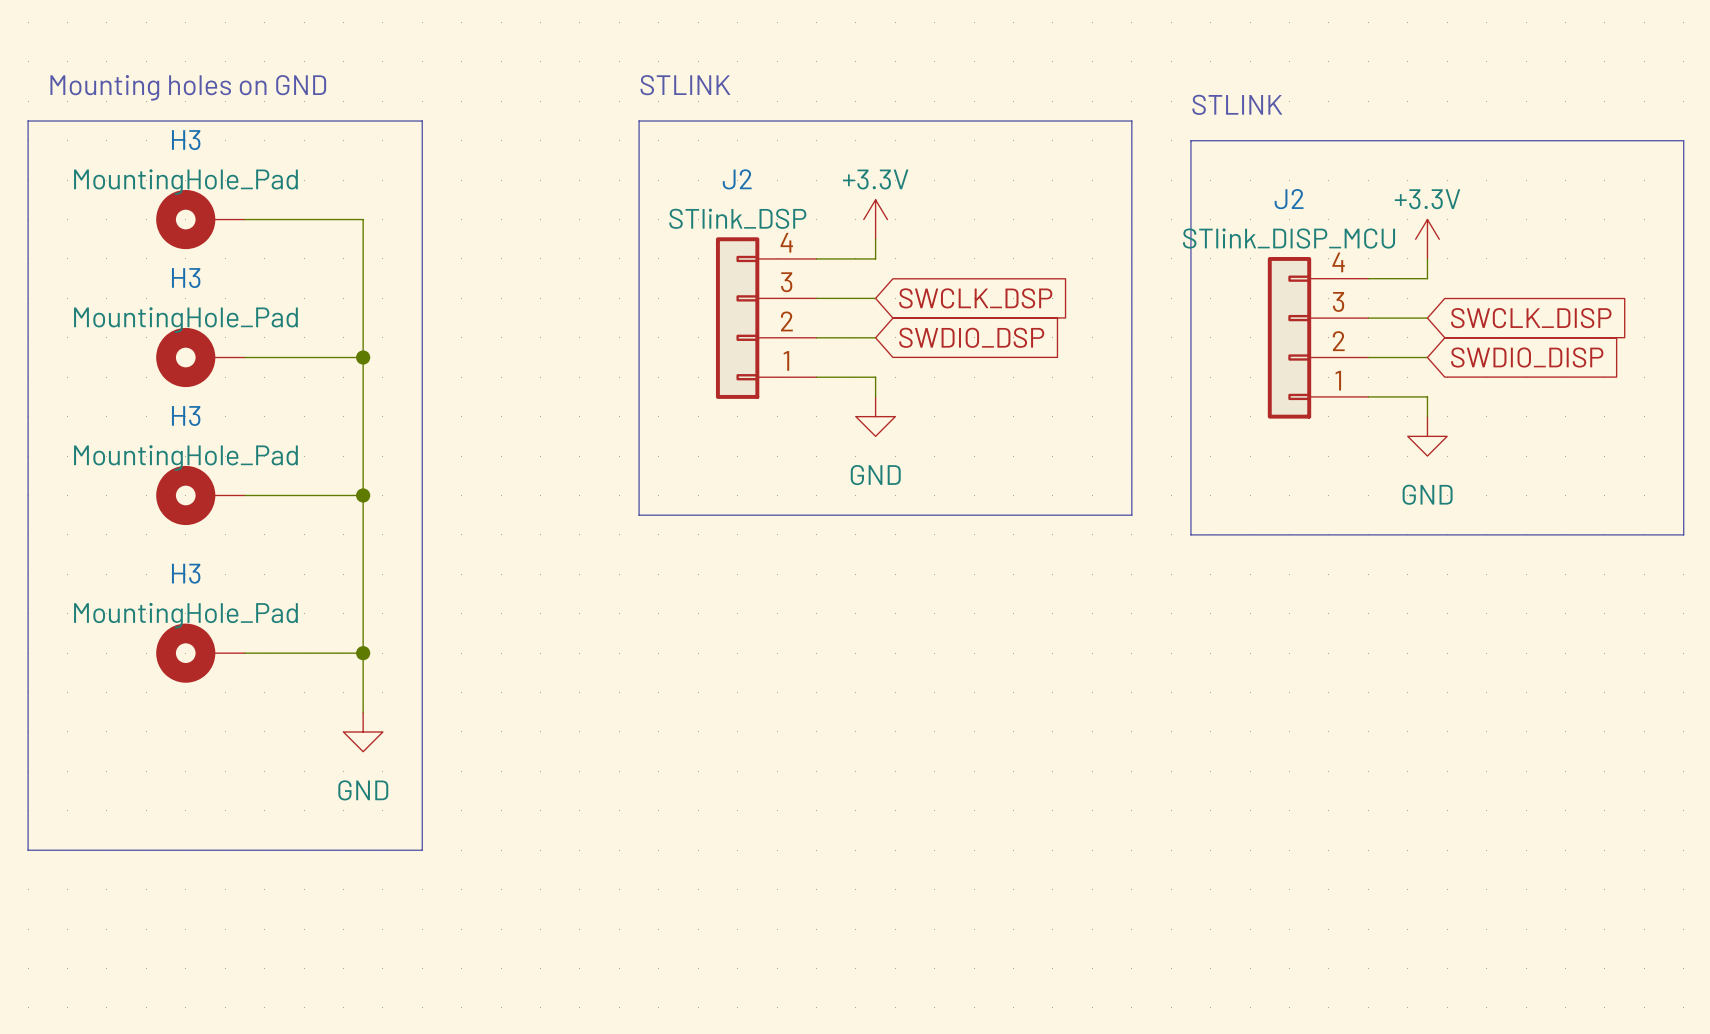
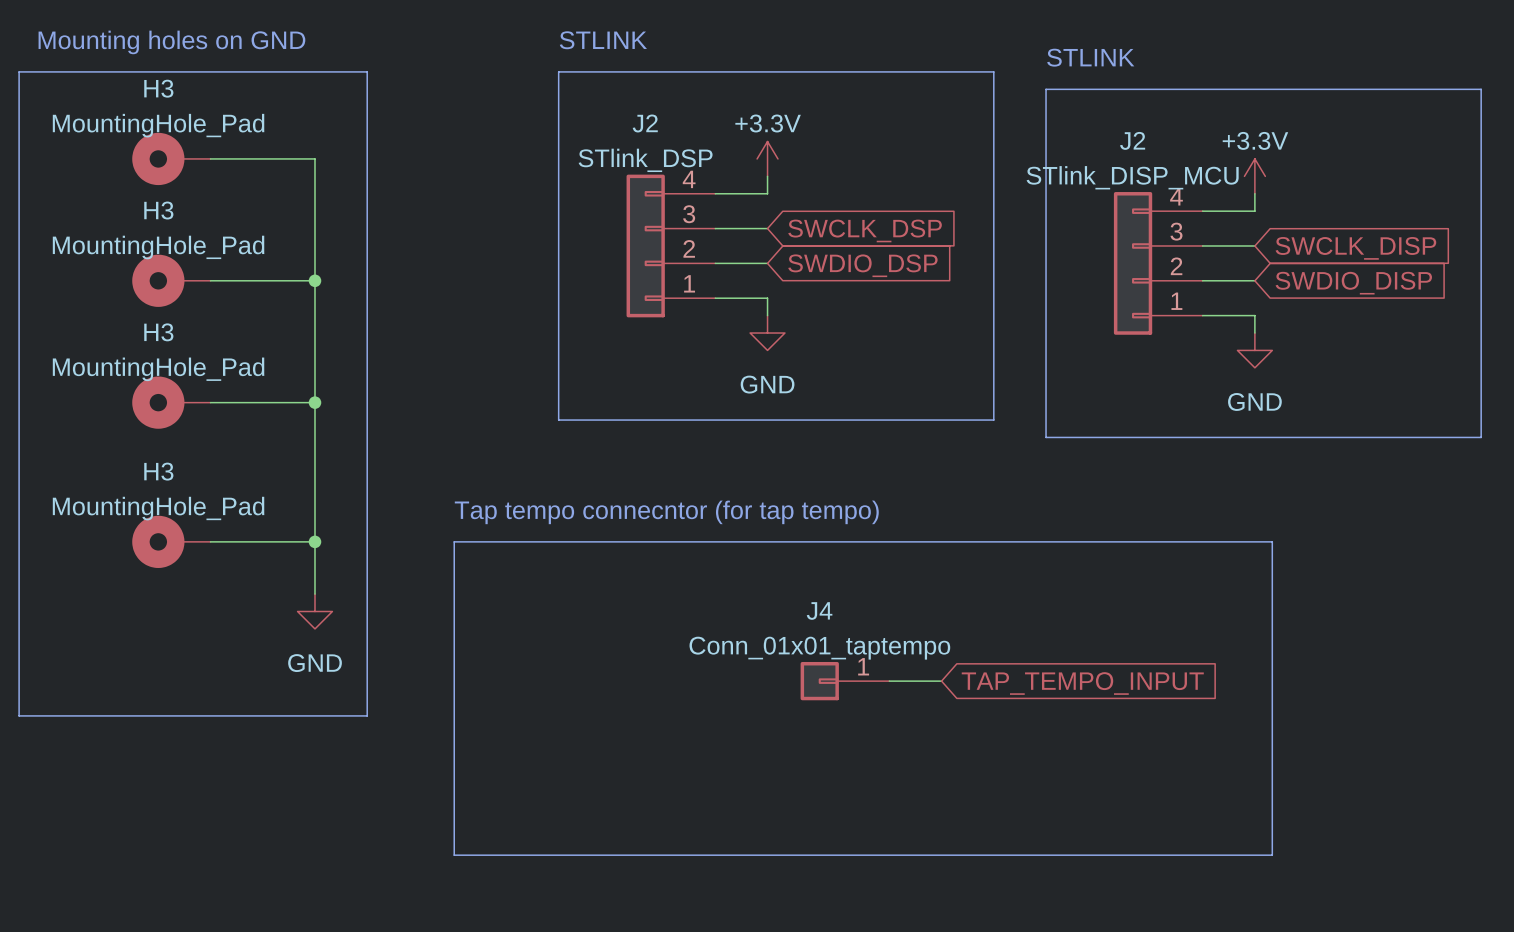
text: none -> Tap tempo connecntor (for tap tempo) (666, 512)
line: none -> (454, 541) (1272, 541) (1272, 855) (454, 855) (454, 541)
J4: none -> Conn_01x01_taptempo (844, 681)
wire: none -> (889, 681) (941, 681)
global label: none -> TAP_TEMPO_INPUT (1082, 683)

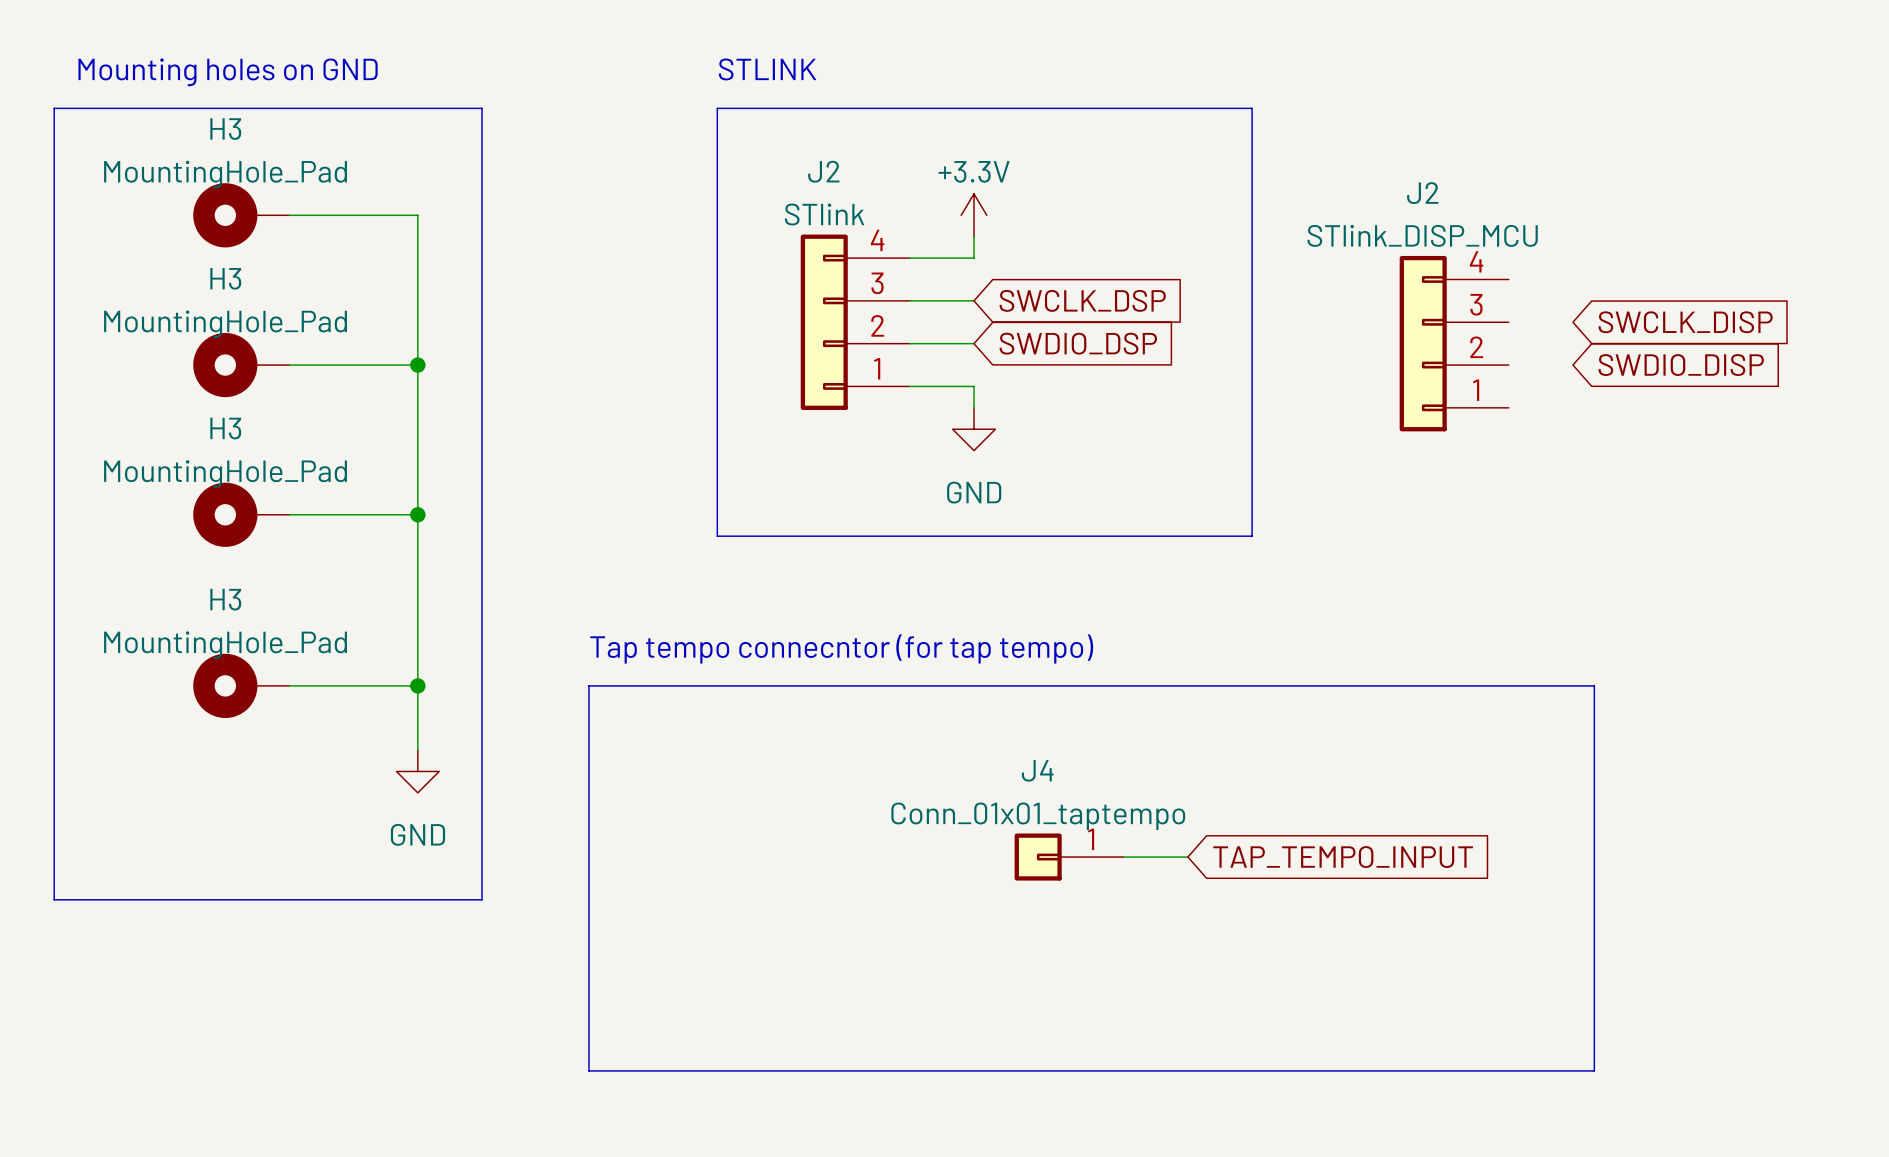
text: STLINK (1090, 57) -> none
line: (1046, 89) (1481, 89) (1481, 437) (1046, 437) (1046, 89) -> none
J2 value: STlink_DSP (645, 160) -> STlink (824, 214)
power symbol: +3.3V (1254, 176) -> none
wire: (1254, 193) (1254, 211) (1202, 211) -> none
wire: (1202, 245) (1254, 245) -> none
wire: (1202, 280) (1254, 280) -> none
wire: (1202, 315) (1254, 315) (1254, 333) -> none
power symbol: GND (1254, 350) -> none

